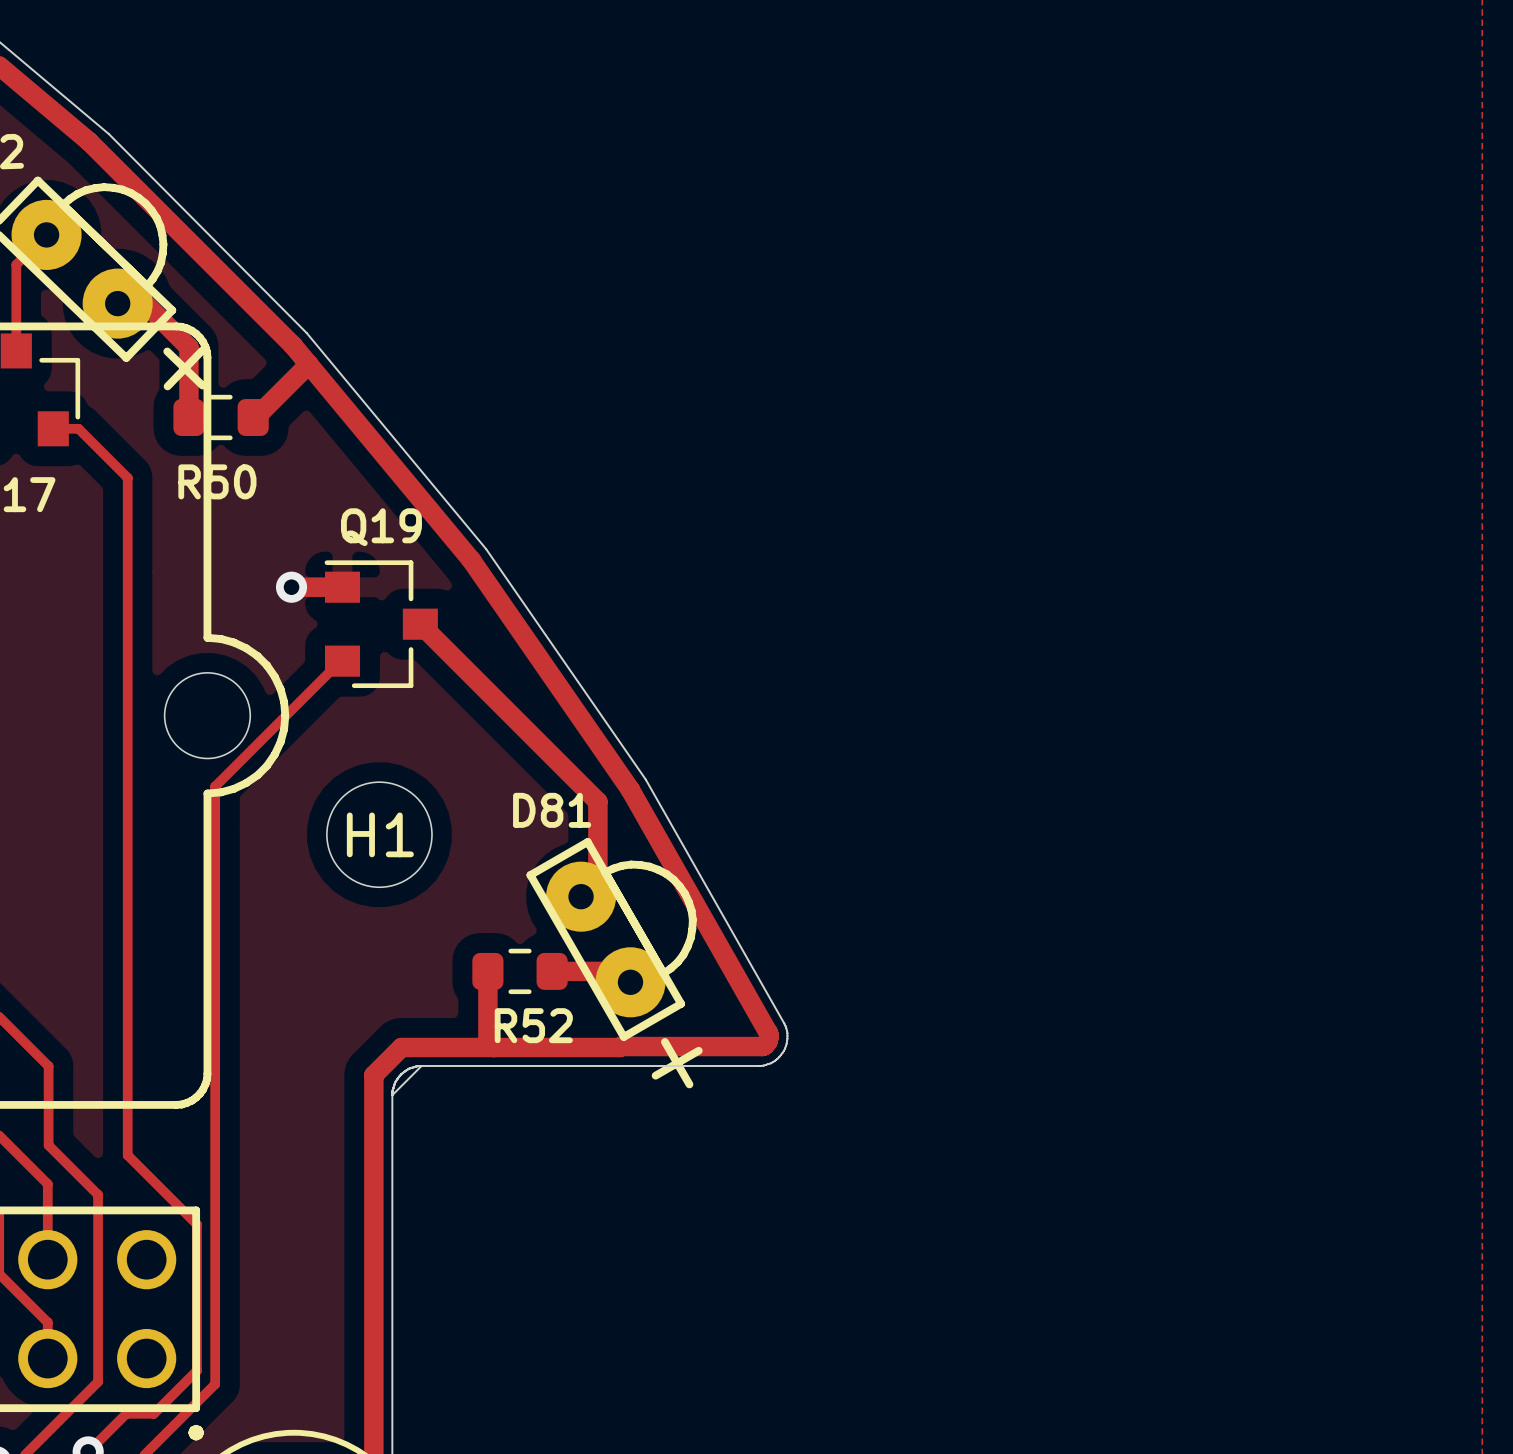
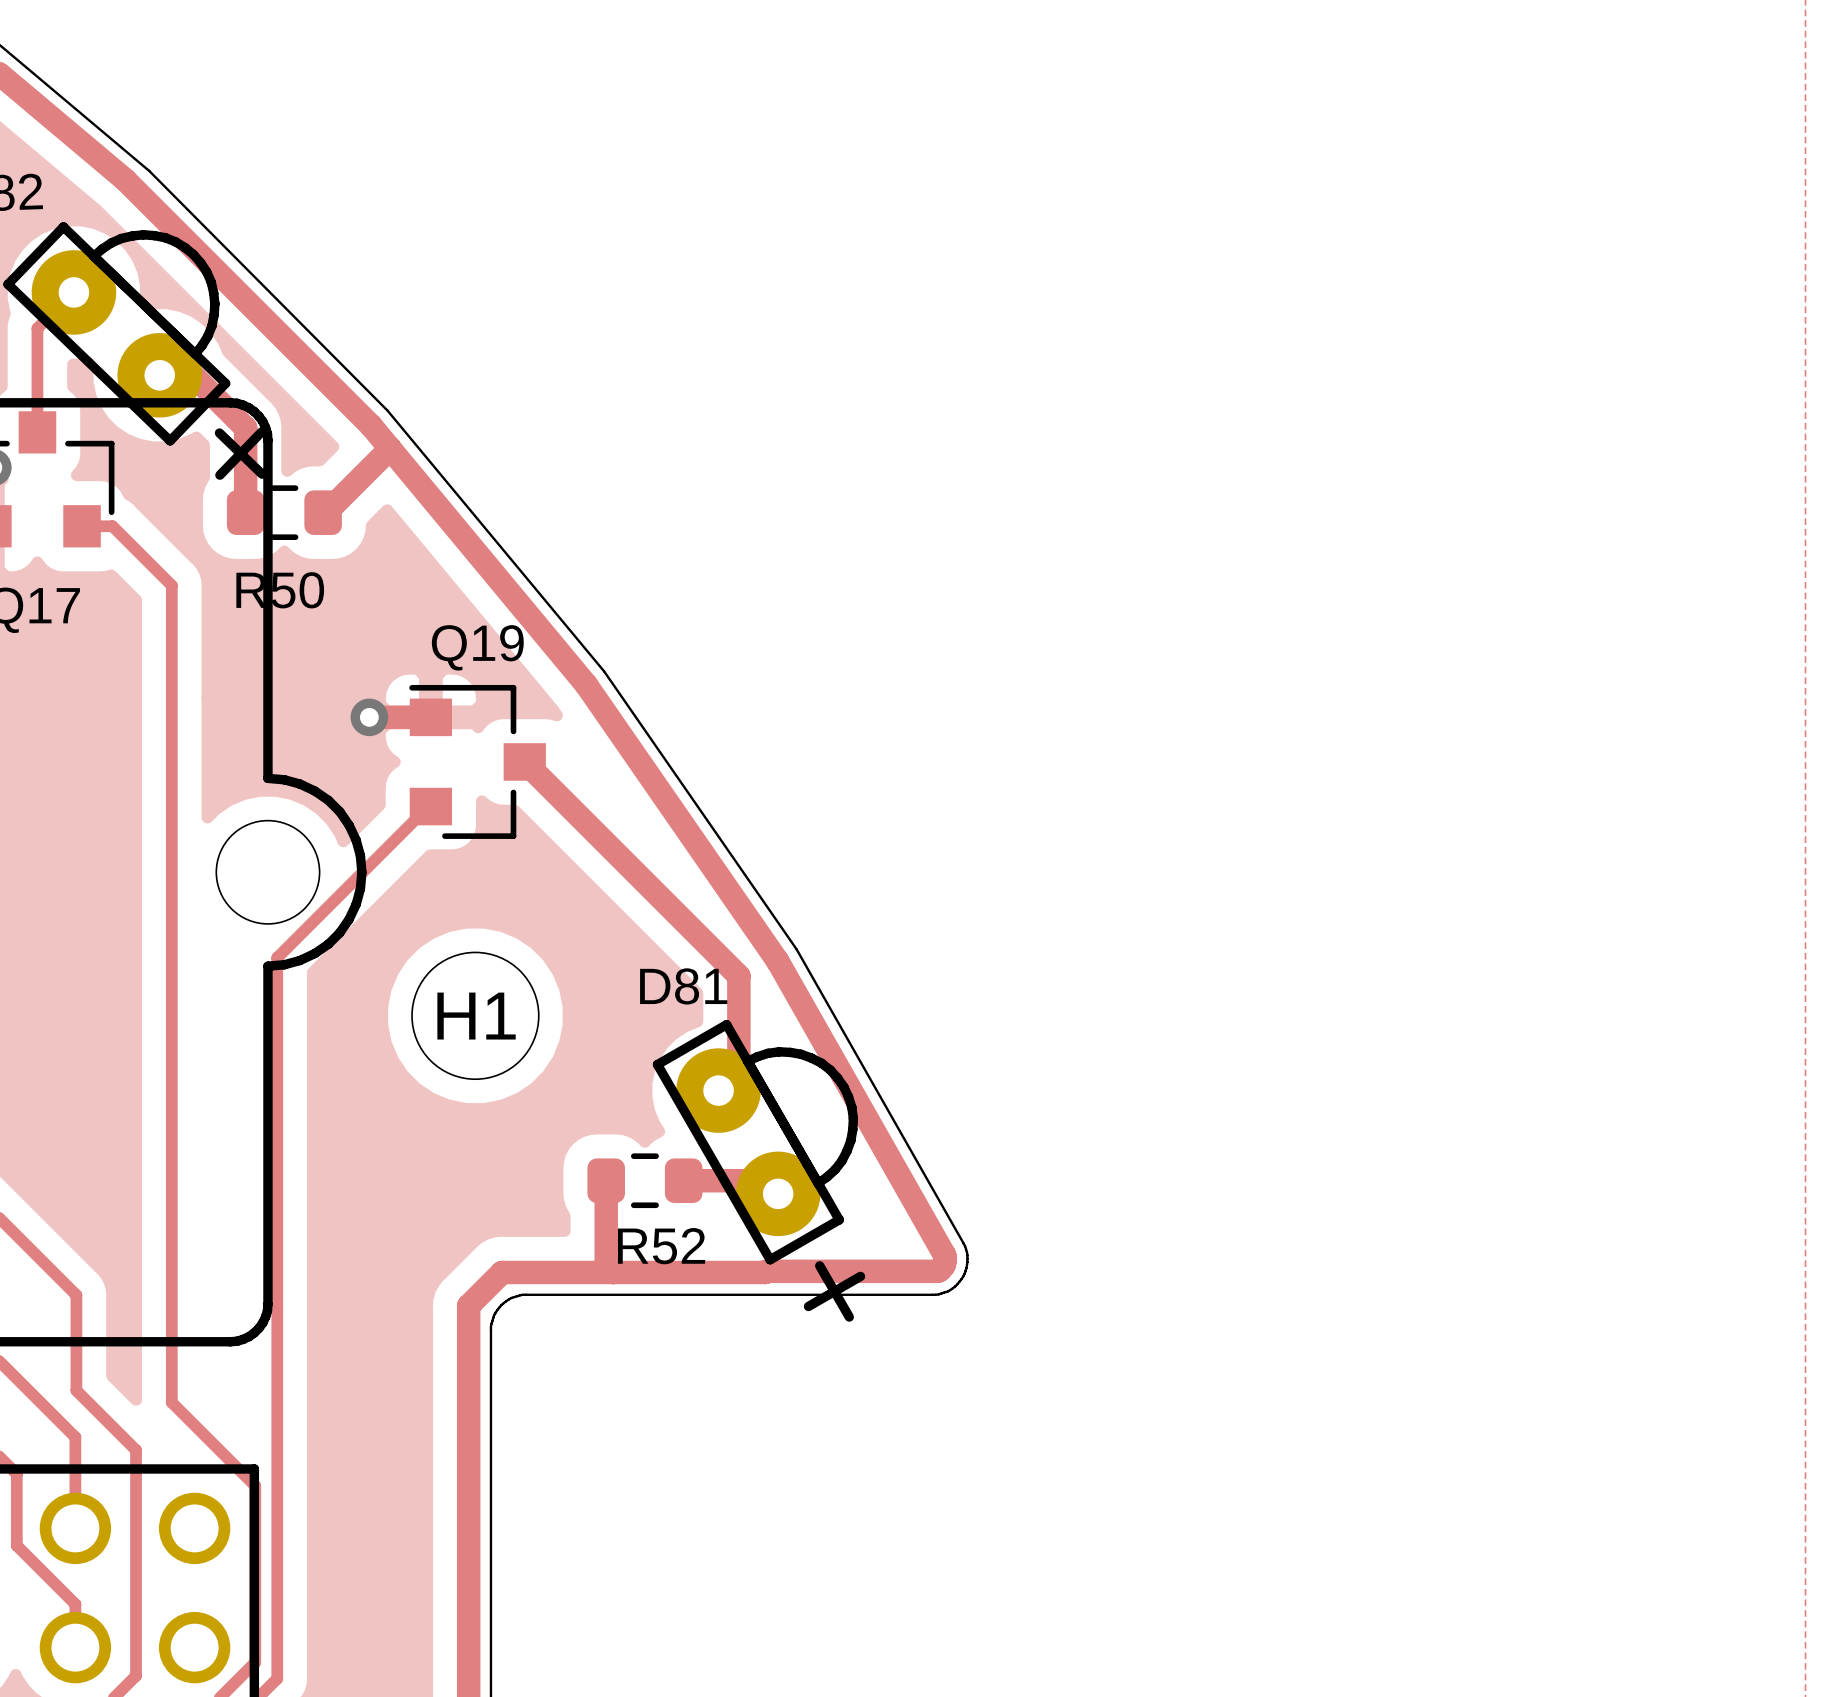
board edge: (421, 1066) (392, 1095) -> none

